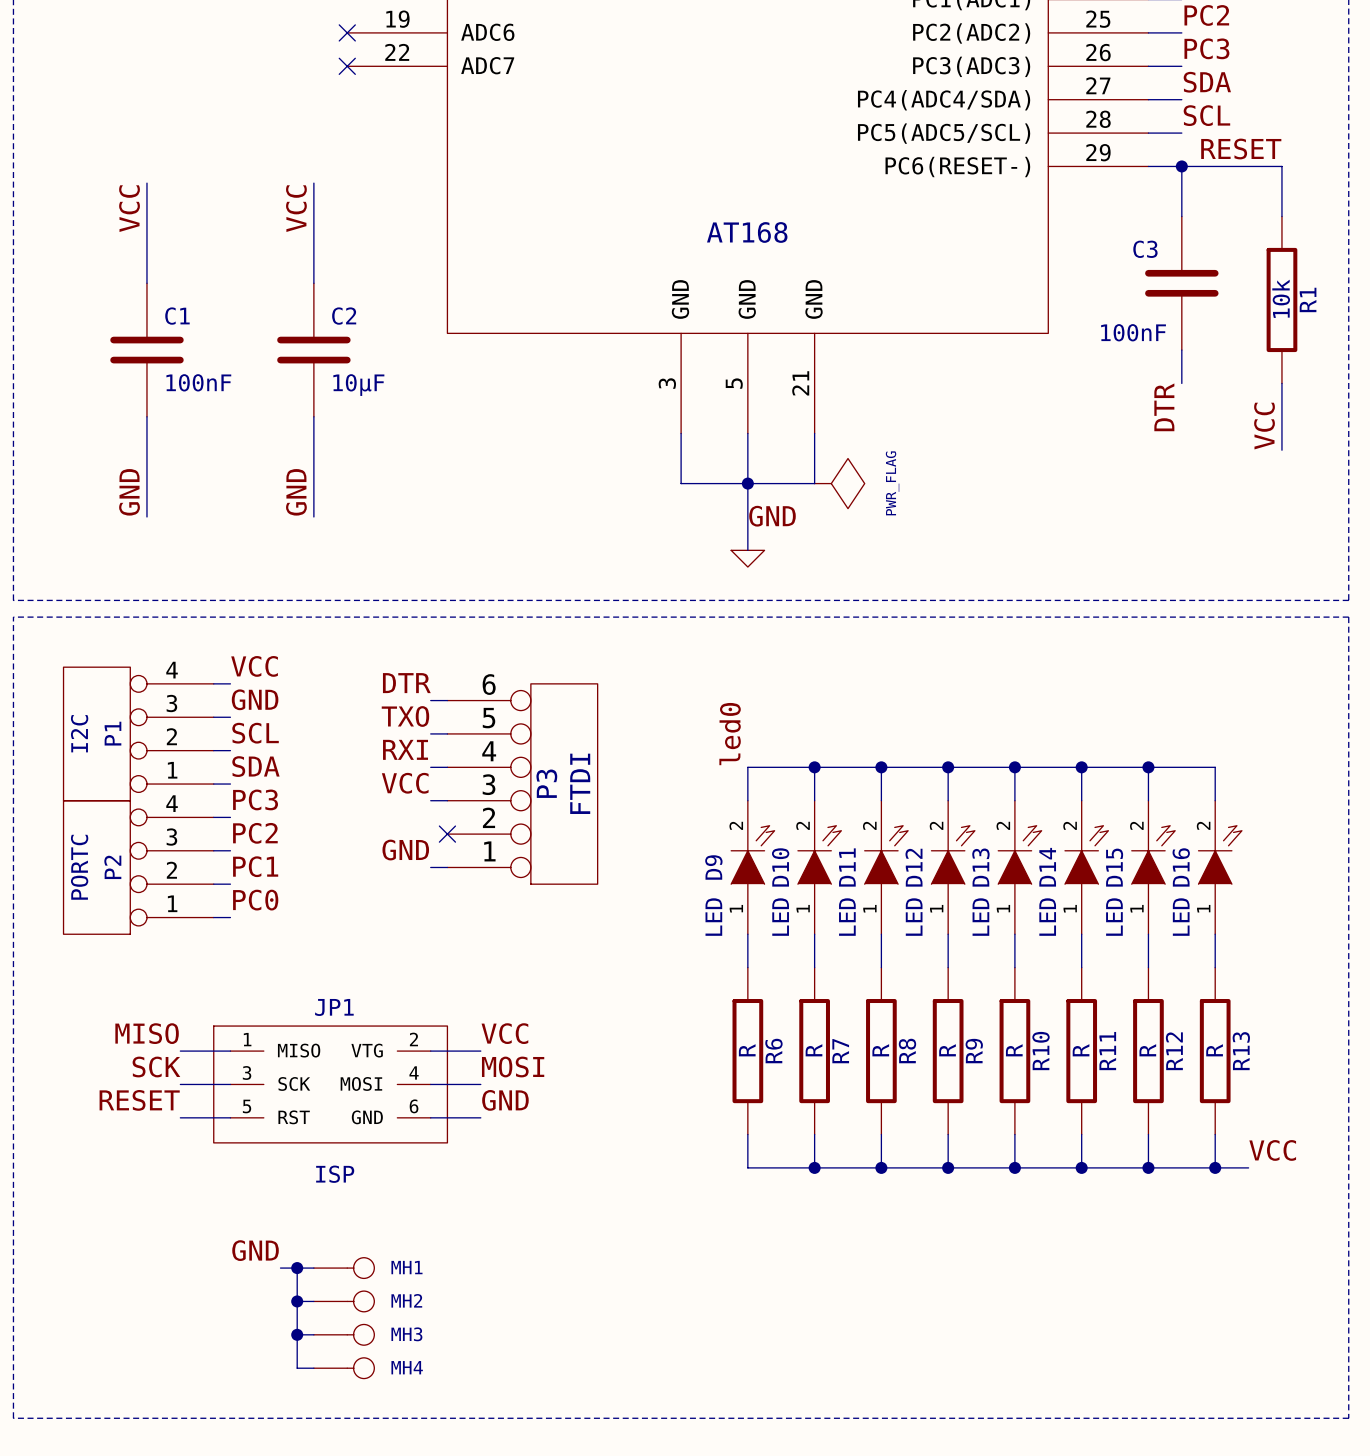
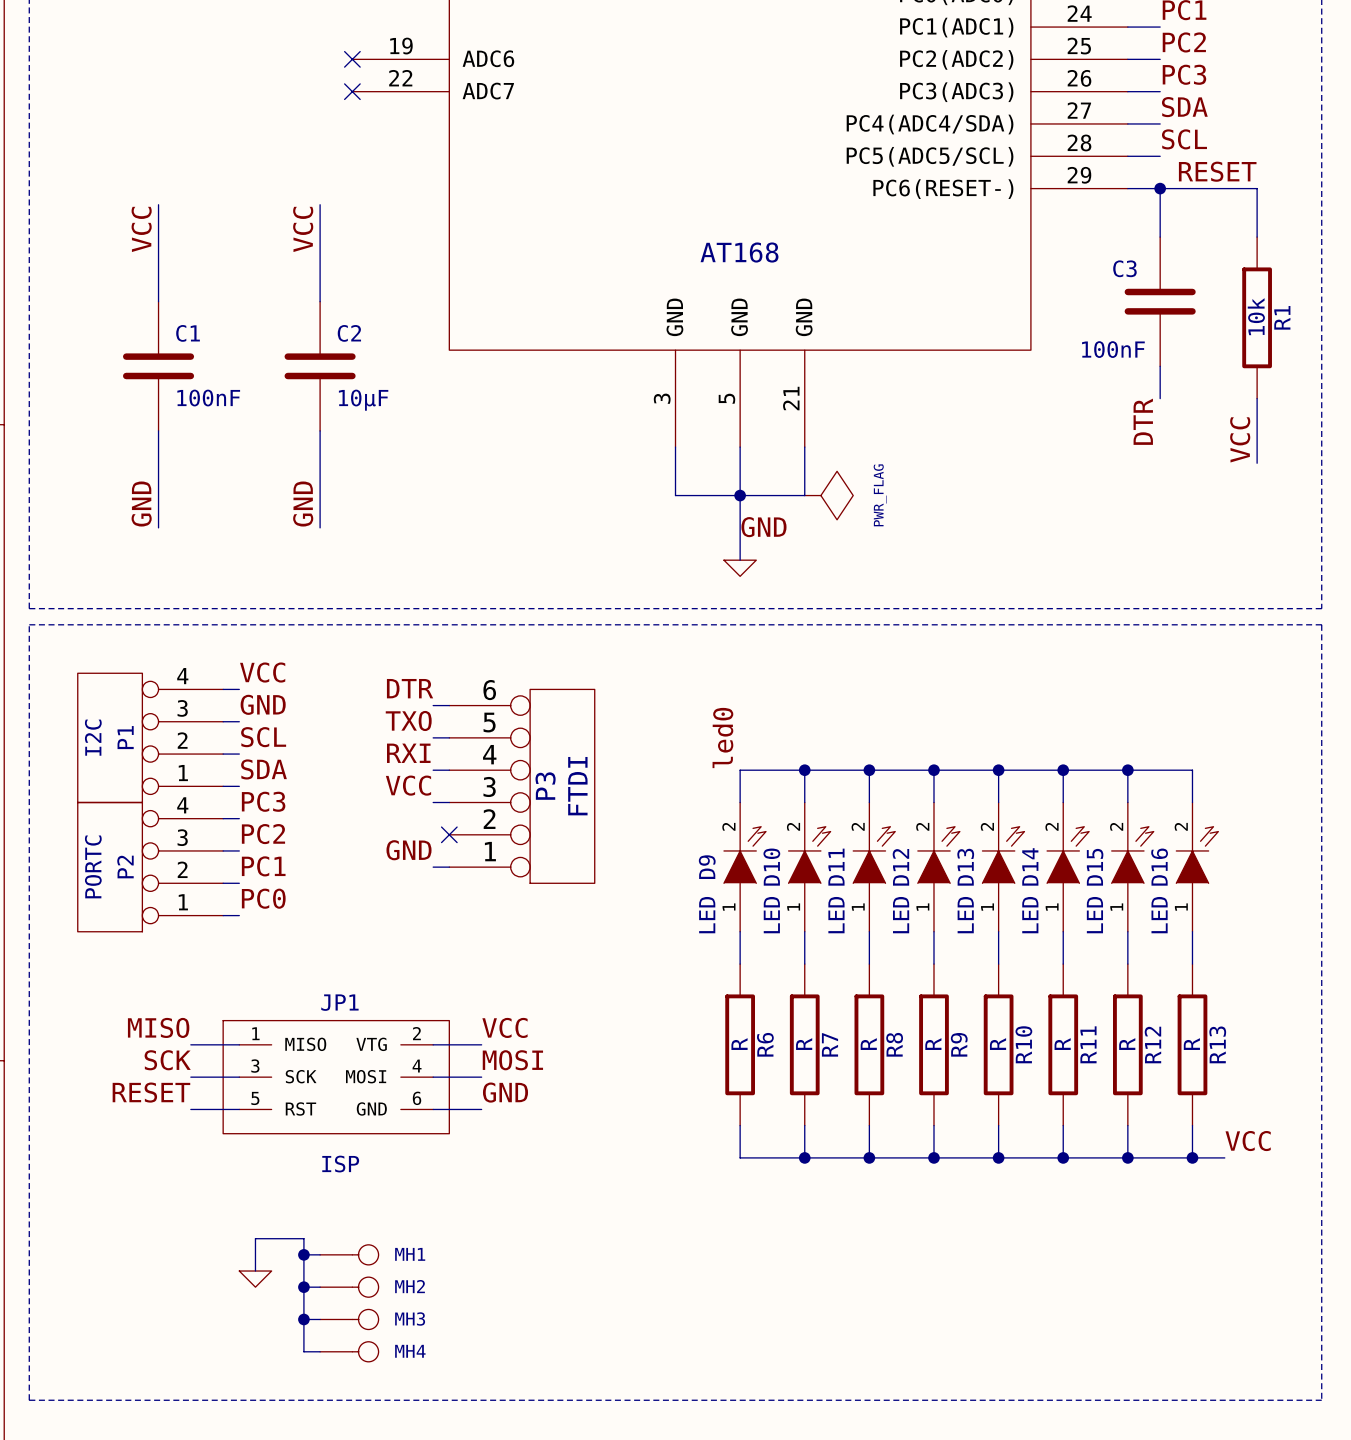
label: GND (255, 1250) -> none
wire: (280, 1268) (297, 1268) -> (255, 1271) (255, 1238) (303, 1238) (303, 1254)
power symbol: none -> (255, 1279)

